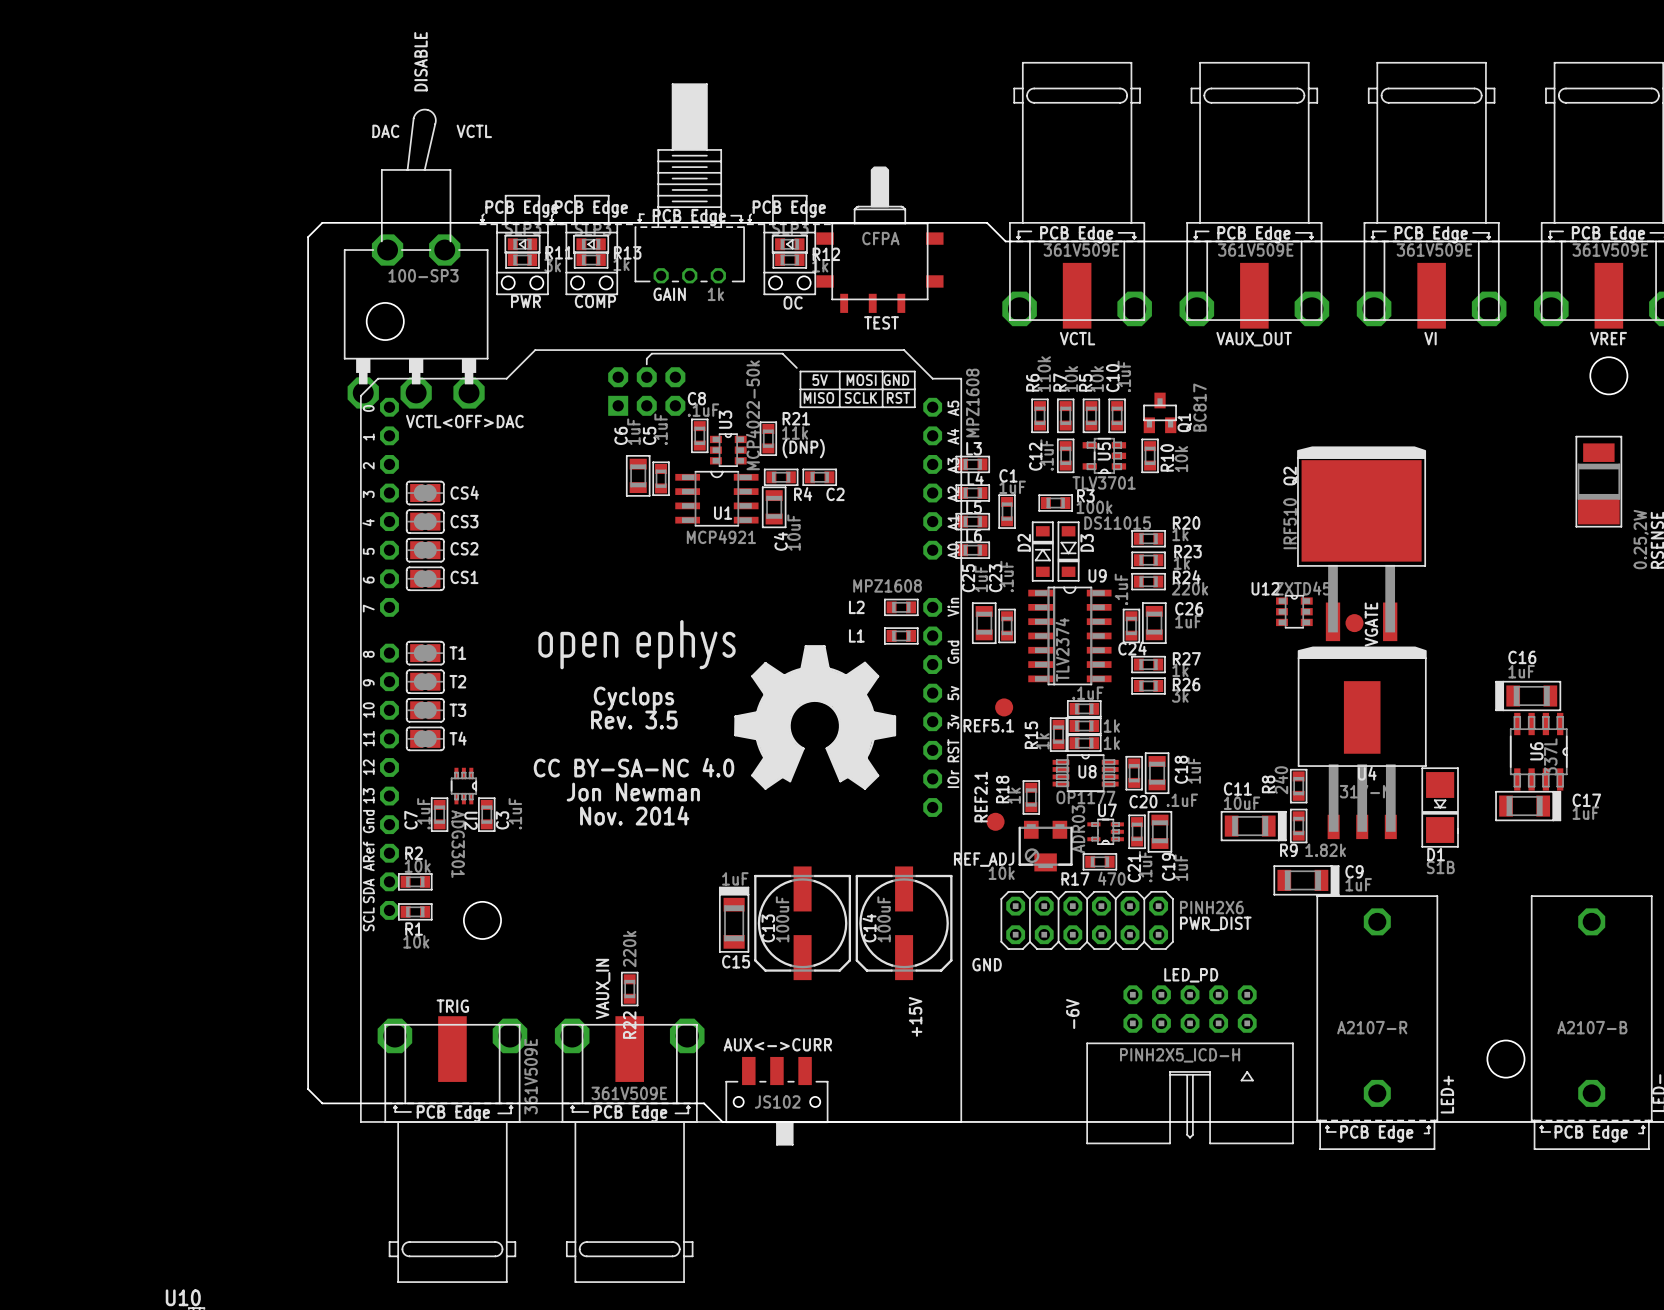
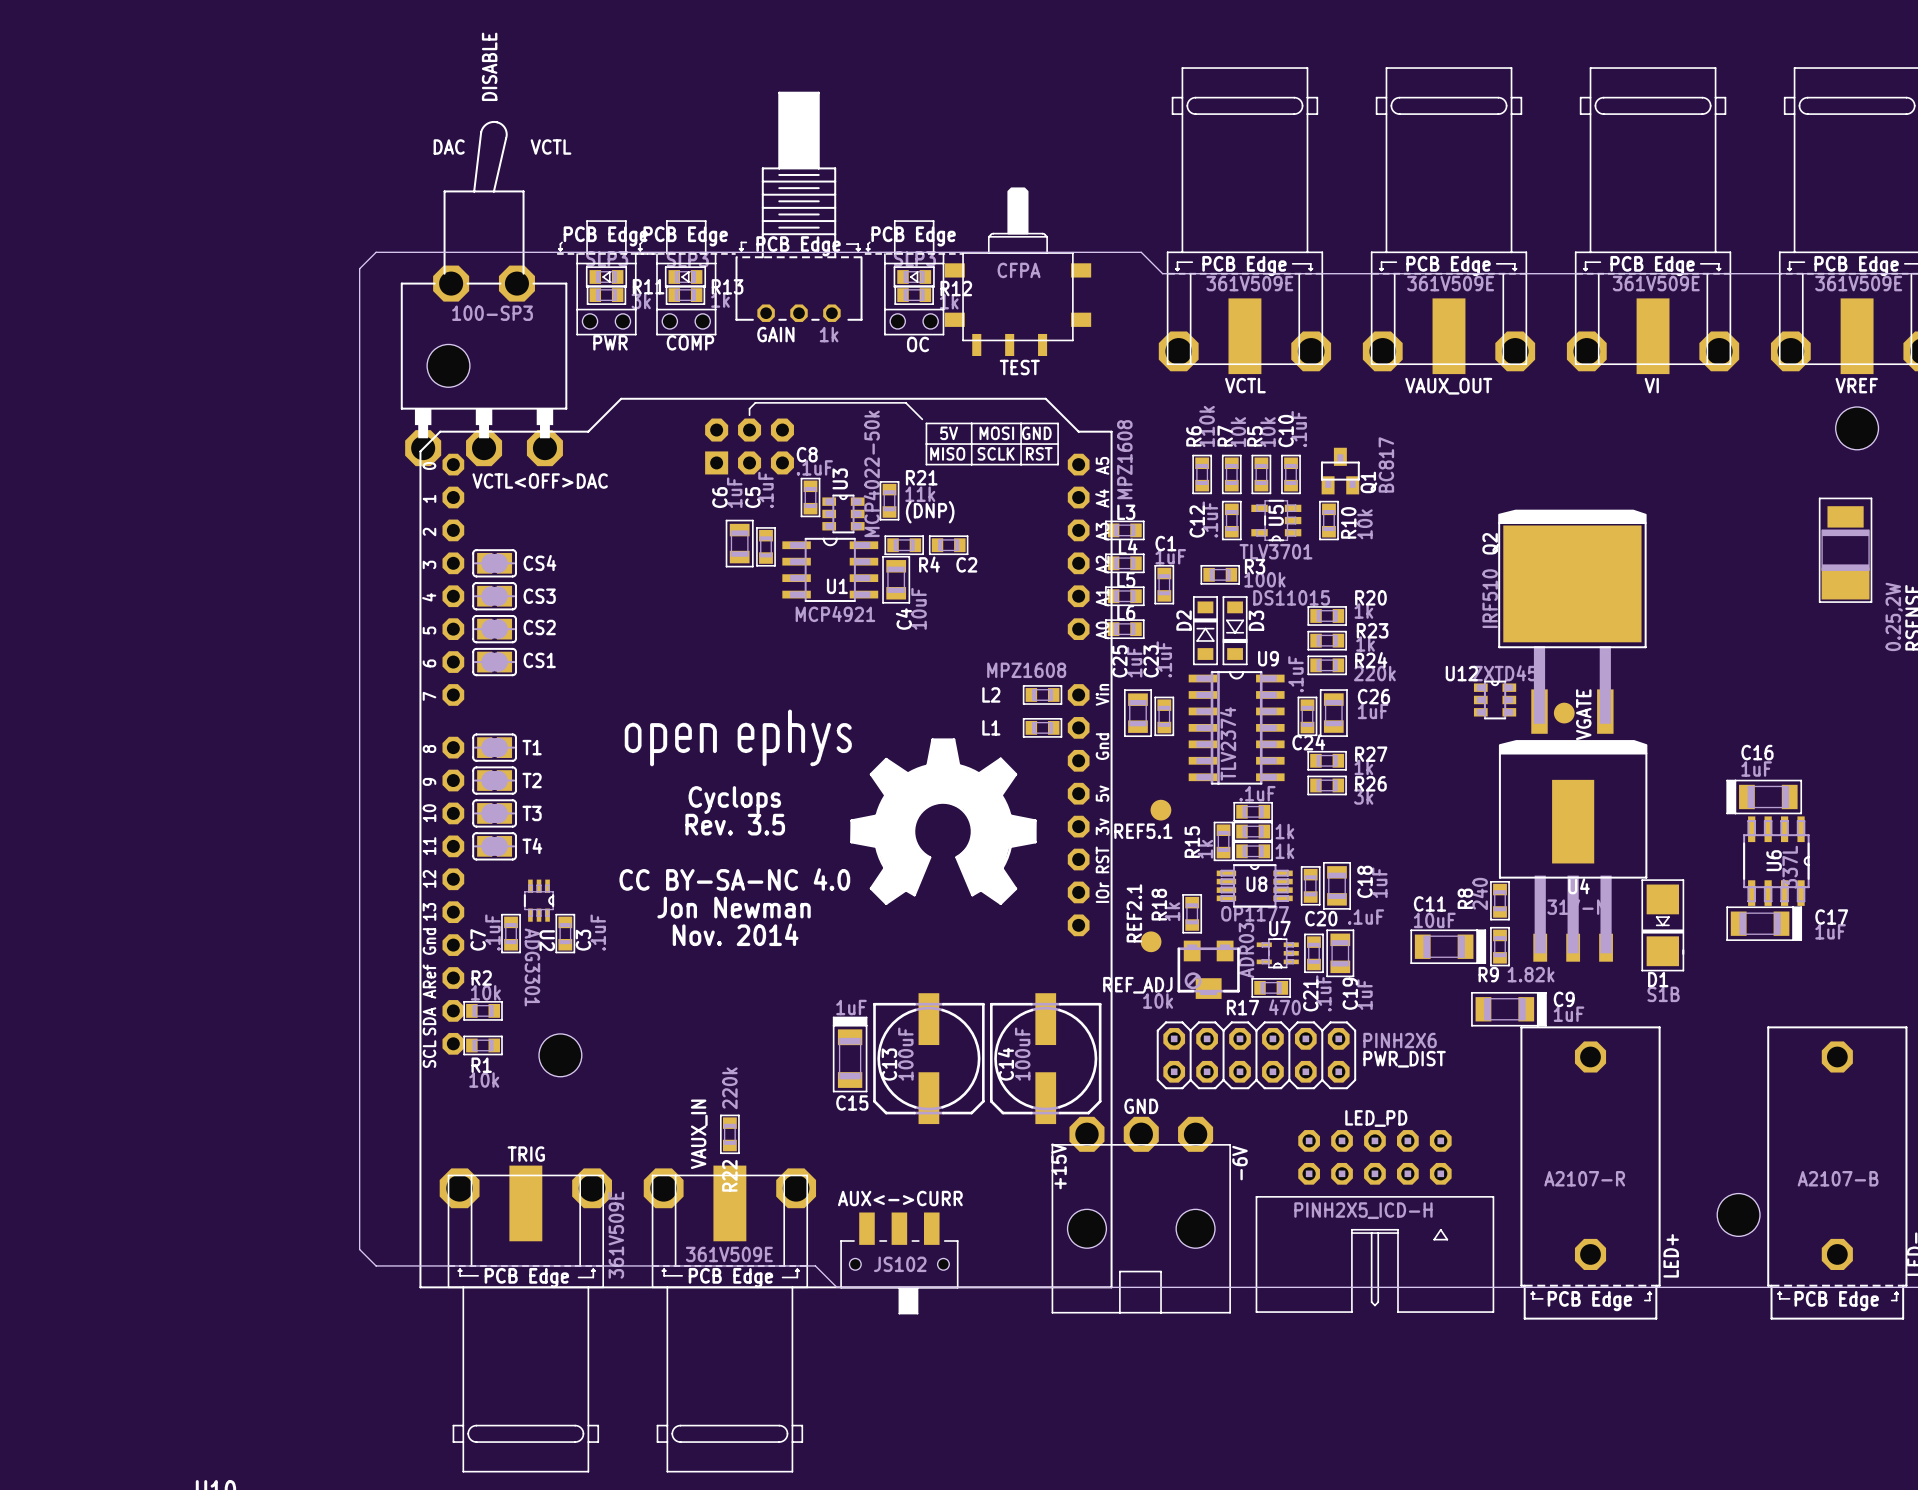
part: none -> (1141, 1215)

